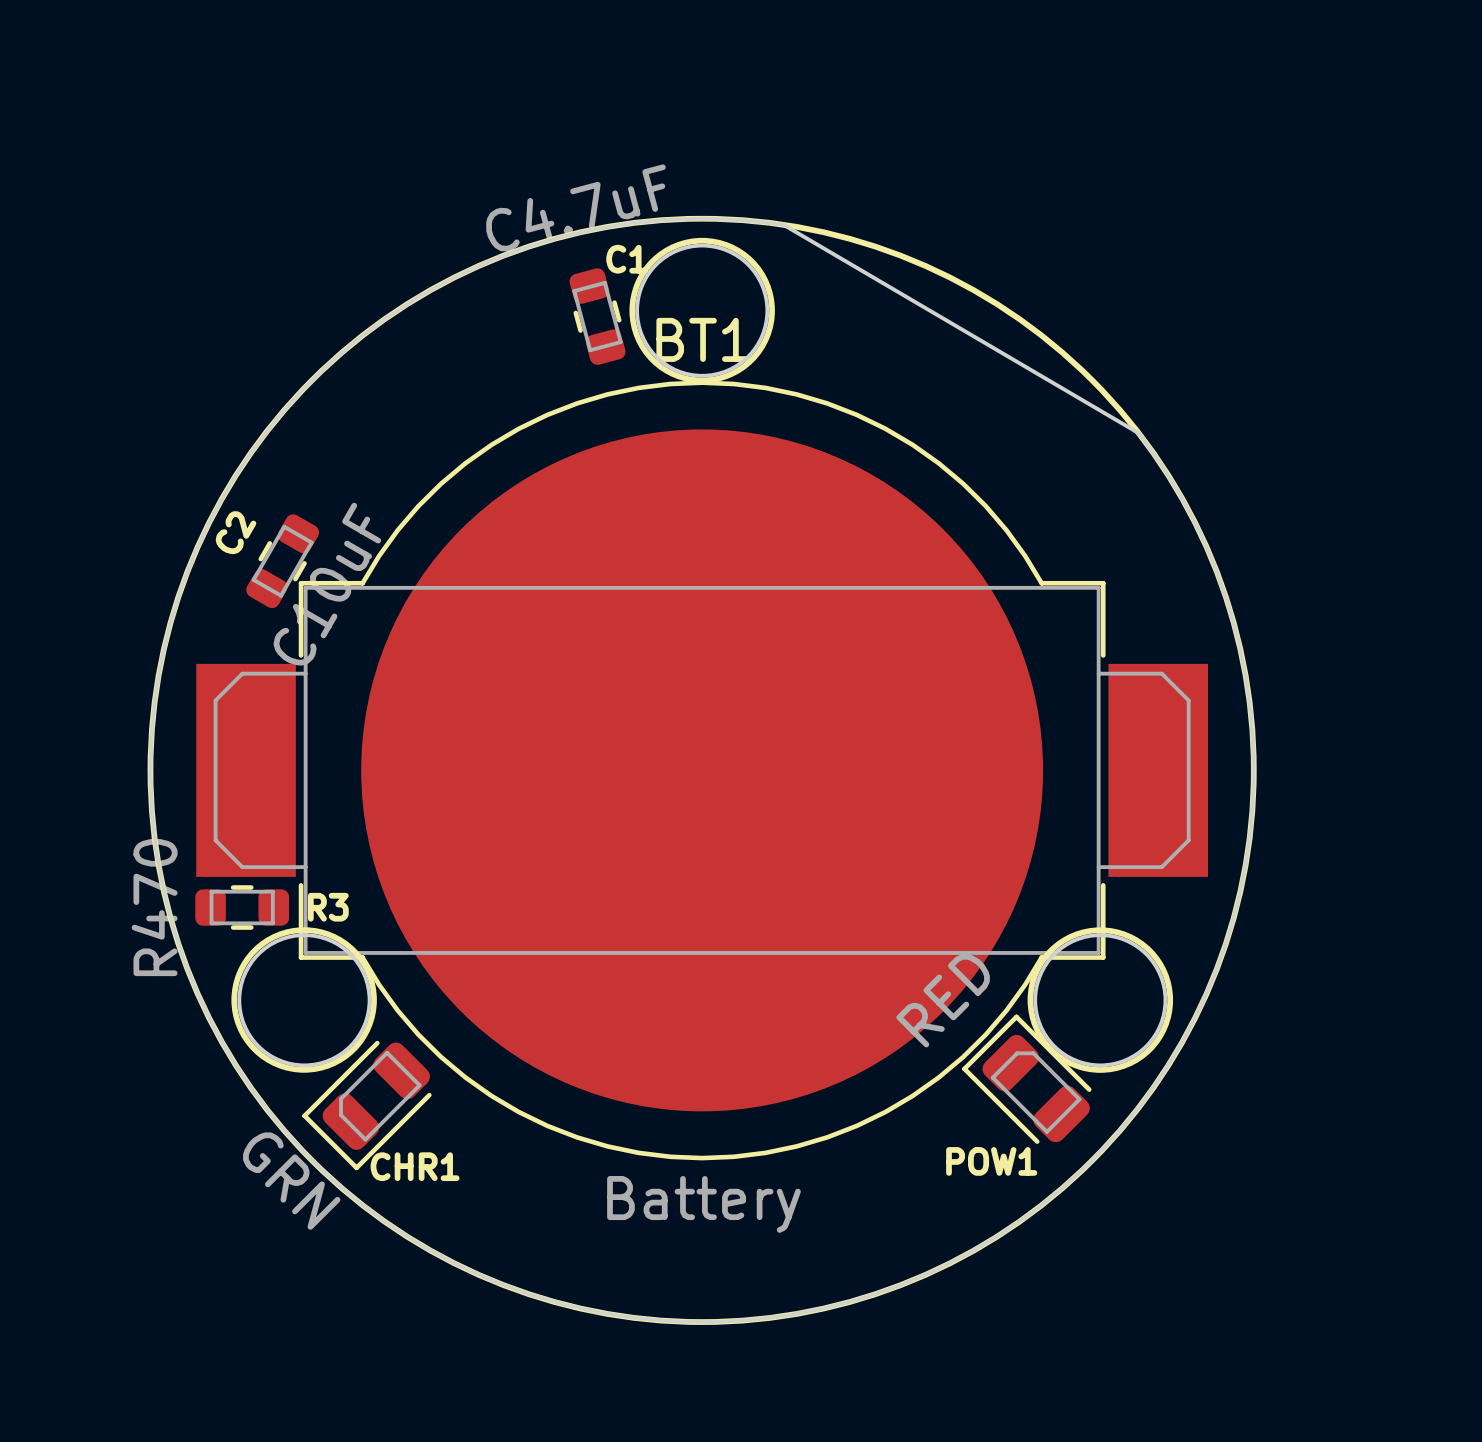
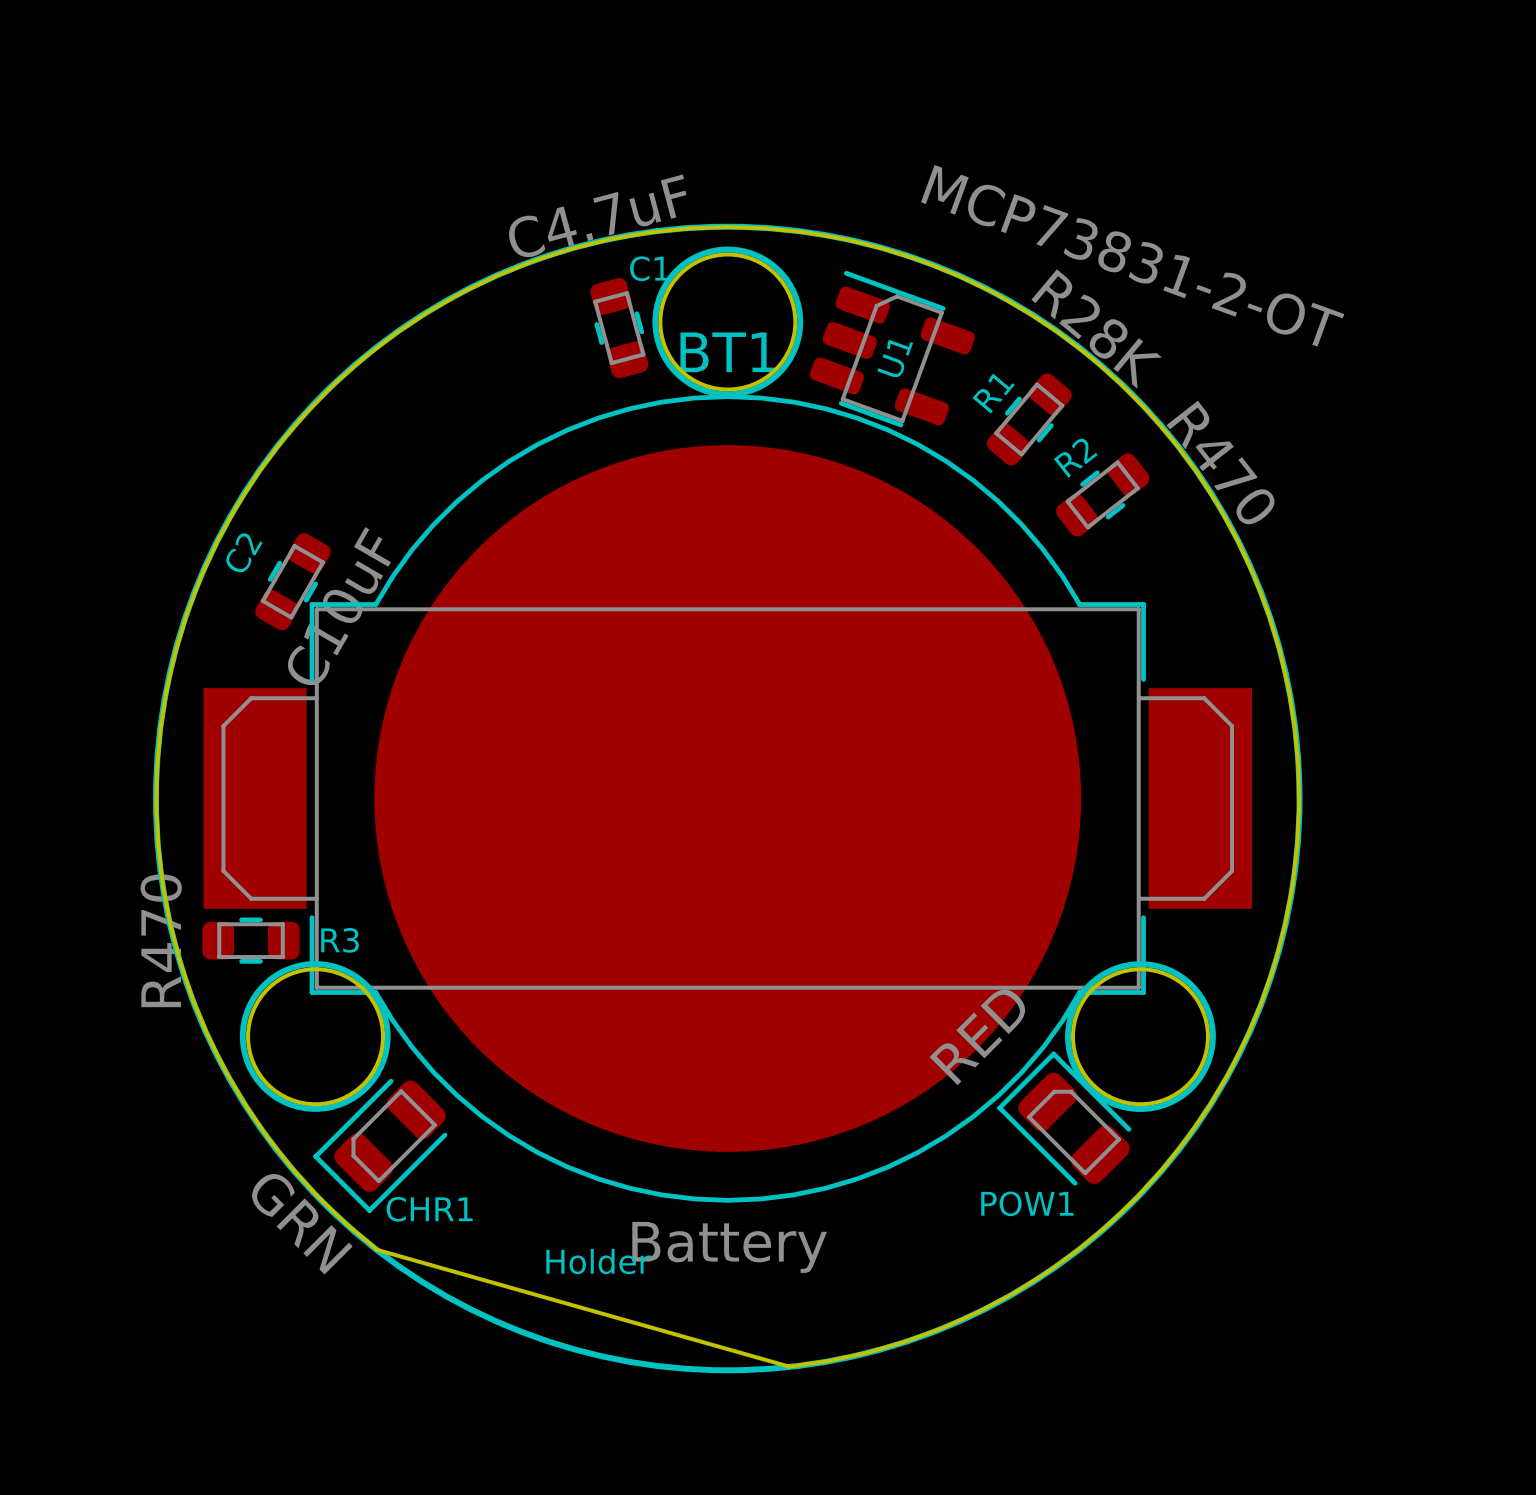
board edge: (783, 224) (1138, 433) (1181, 496) (1214, 564) (1227, 600) (1237, 637) (1250, 712) (1253, 750) (1251, 826) (1238, 901) (1227, 937) (1199, 1008) (1162, 1074) (1140, 1105) (1116, 1135) (1062, 1188) (1001, 1234) (968, 1253) (934, 1270) (863, 1297) (789, 1315) (751, 1319) (675, 1321) (637, 1318) (563, 1304) (526, 1293) (456, 1264) (422, 1246) (360, 1203) (331, 1178) (278, 1123) (255, 1093) (214, 1029) (183, 959) (172, 923) (162, 886) (151, 811) (151, 735) (155, 697) (161, 660) (181, 586) (212, 517) (230, 483) (251, 452) (299, 393) (326, 366) (385, 318) (417, 297) (485, 263) (520, 249) (594, 229) (631, 223) (707, 218) (783, 224) -> (377, 1249) (789, 1366) (866, 1352) (904, 1341) (977, 1312) (1045, 1273) (1077, 1250) (1136, 1197) (1163, 1168) (1209, 1105) (1229, 1071) (1262, 999) (1275, 962) (1292, 885) (1297, 846) (1299, 807) (1294, 728) (1279, 651) (1268, 613) (1237, 540) (1218, 506) (1174, 441) (1148, 411) (1091, 357) (1060, 333) (993, 292) (957, 275) (883, 248) (806, 232) (767, 228) (727, 227) (649, 232) (610, 239) (534, 260) (498, 275) (428, 311) (364, 357) (307, 411) (281, 441) (258, 473) (217, 540) (201, 576) (175, 650) (166, 689) (157, 767) (158, 846) (170, 923) (180, 962) (192, 999) (225, 1071) (245, 1105) (292, 1168) (318, 1197) (377, 1249)
U1: none -> MCP73831-2-OT (892, 349)
R1: none -> R28K (1029, 419)
R2: none -> R470 (1102, 494)
text: none -> Holder (598, 1261)

